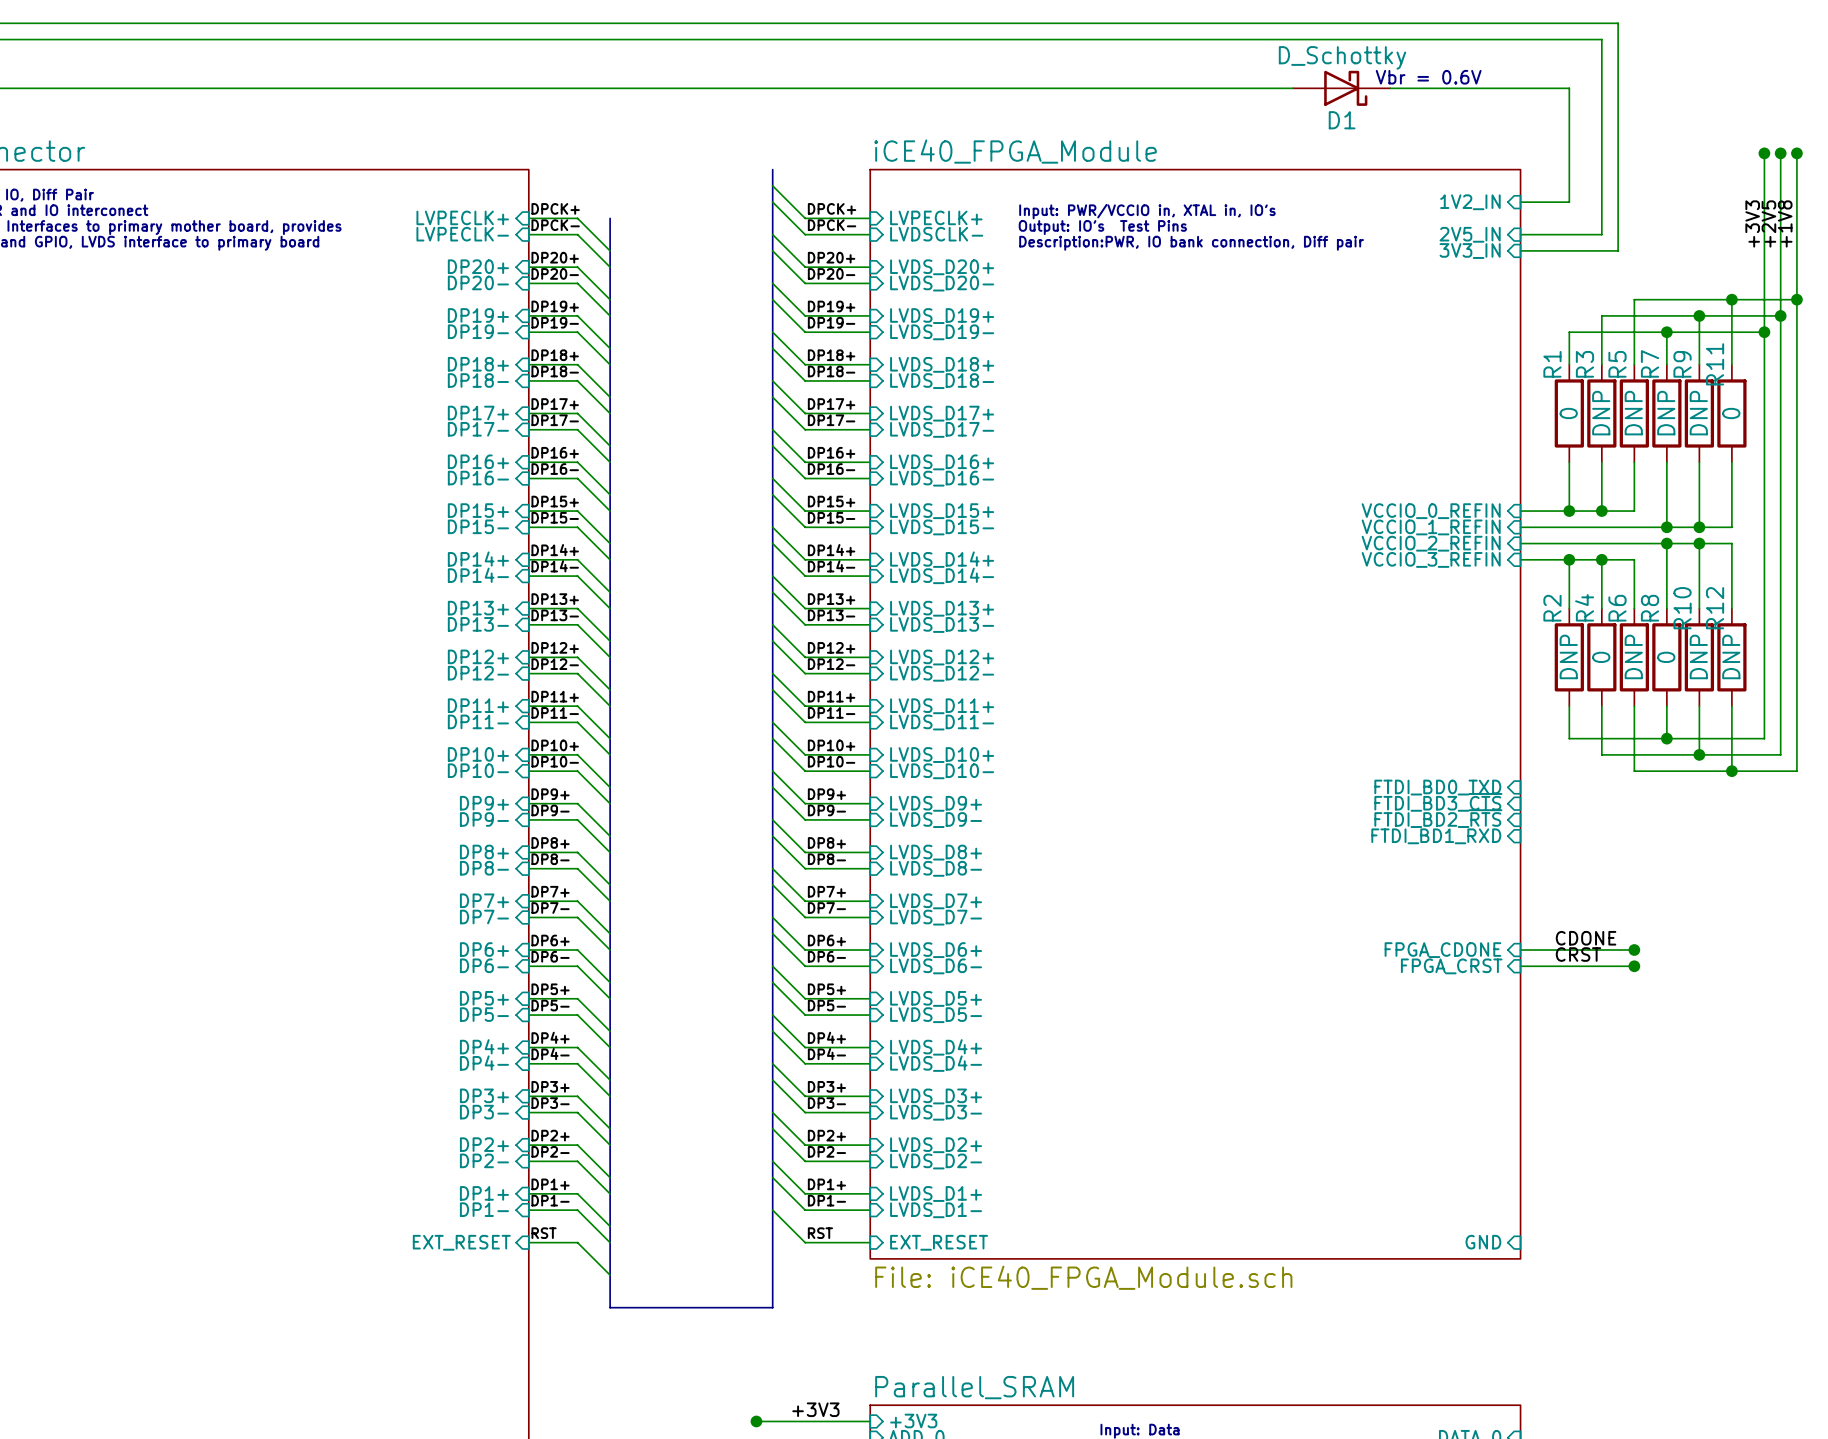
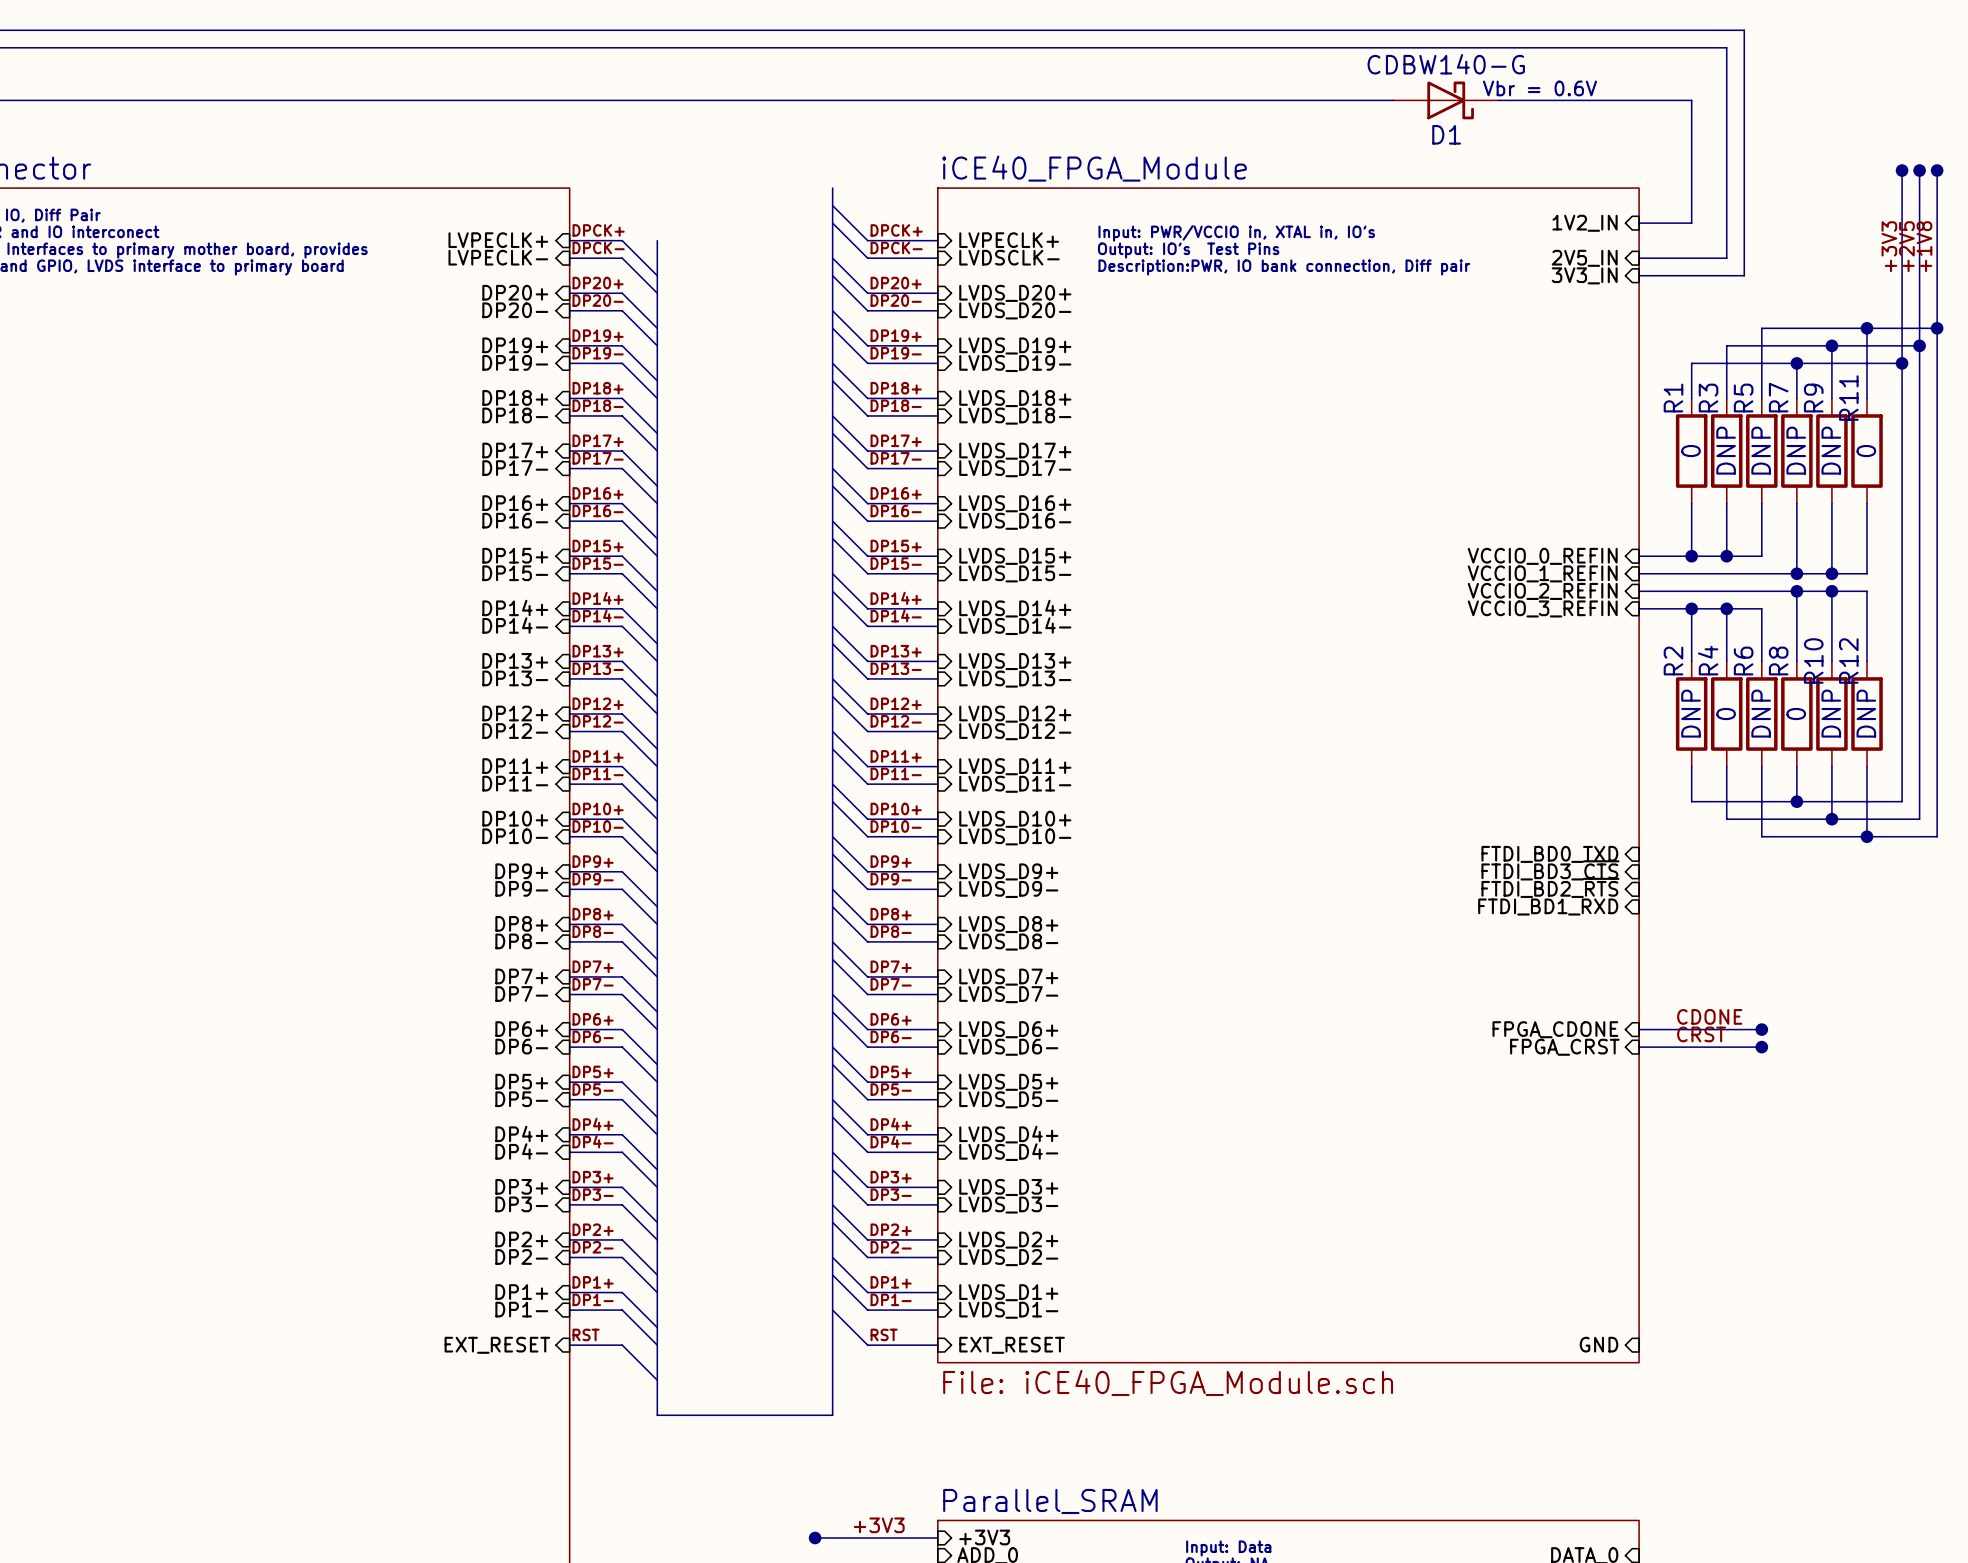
D1 value: D_Schottky (1342, 57) -> CDBW140-G (1446, 64)

